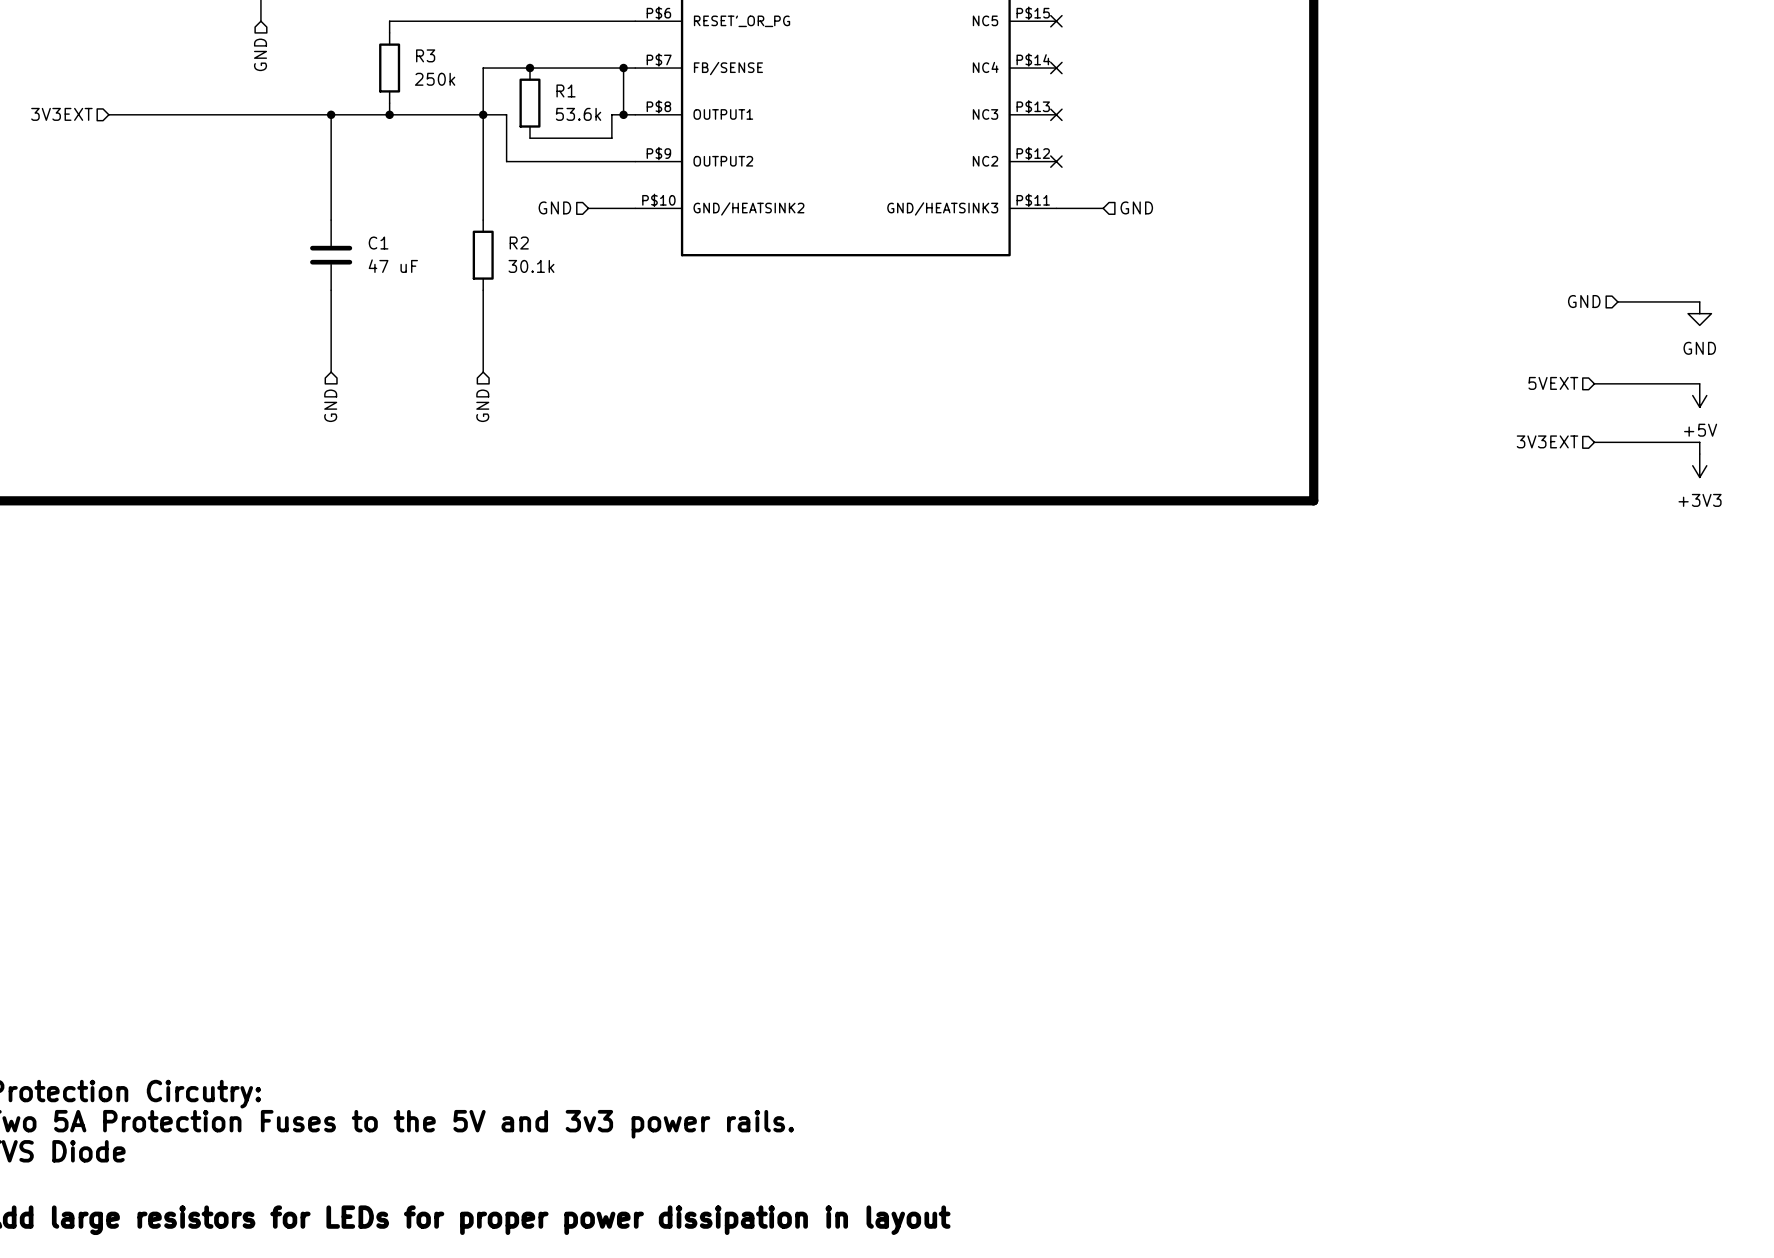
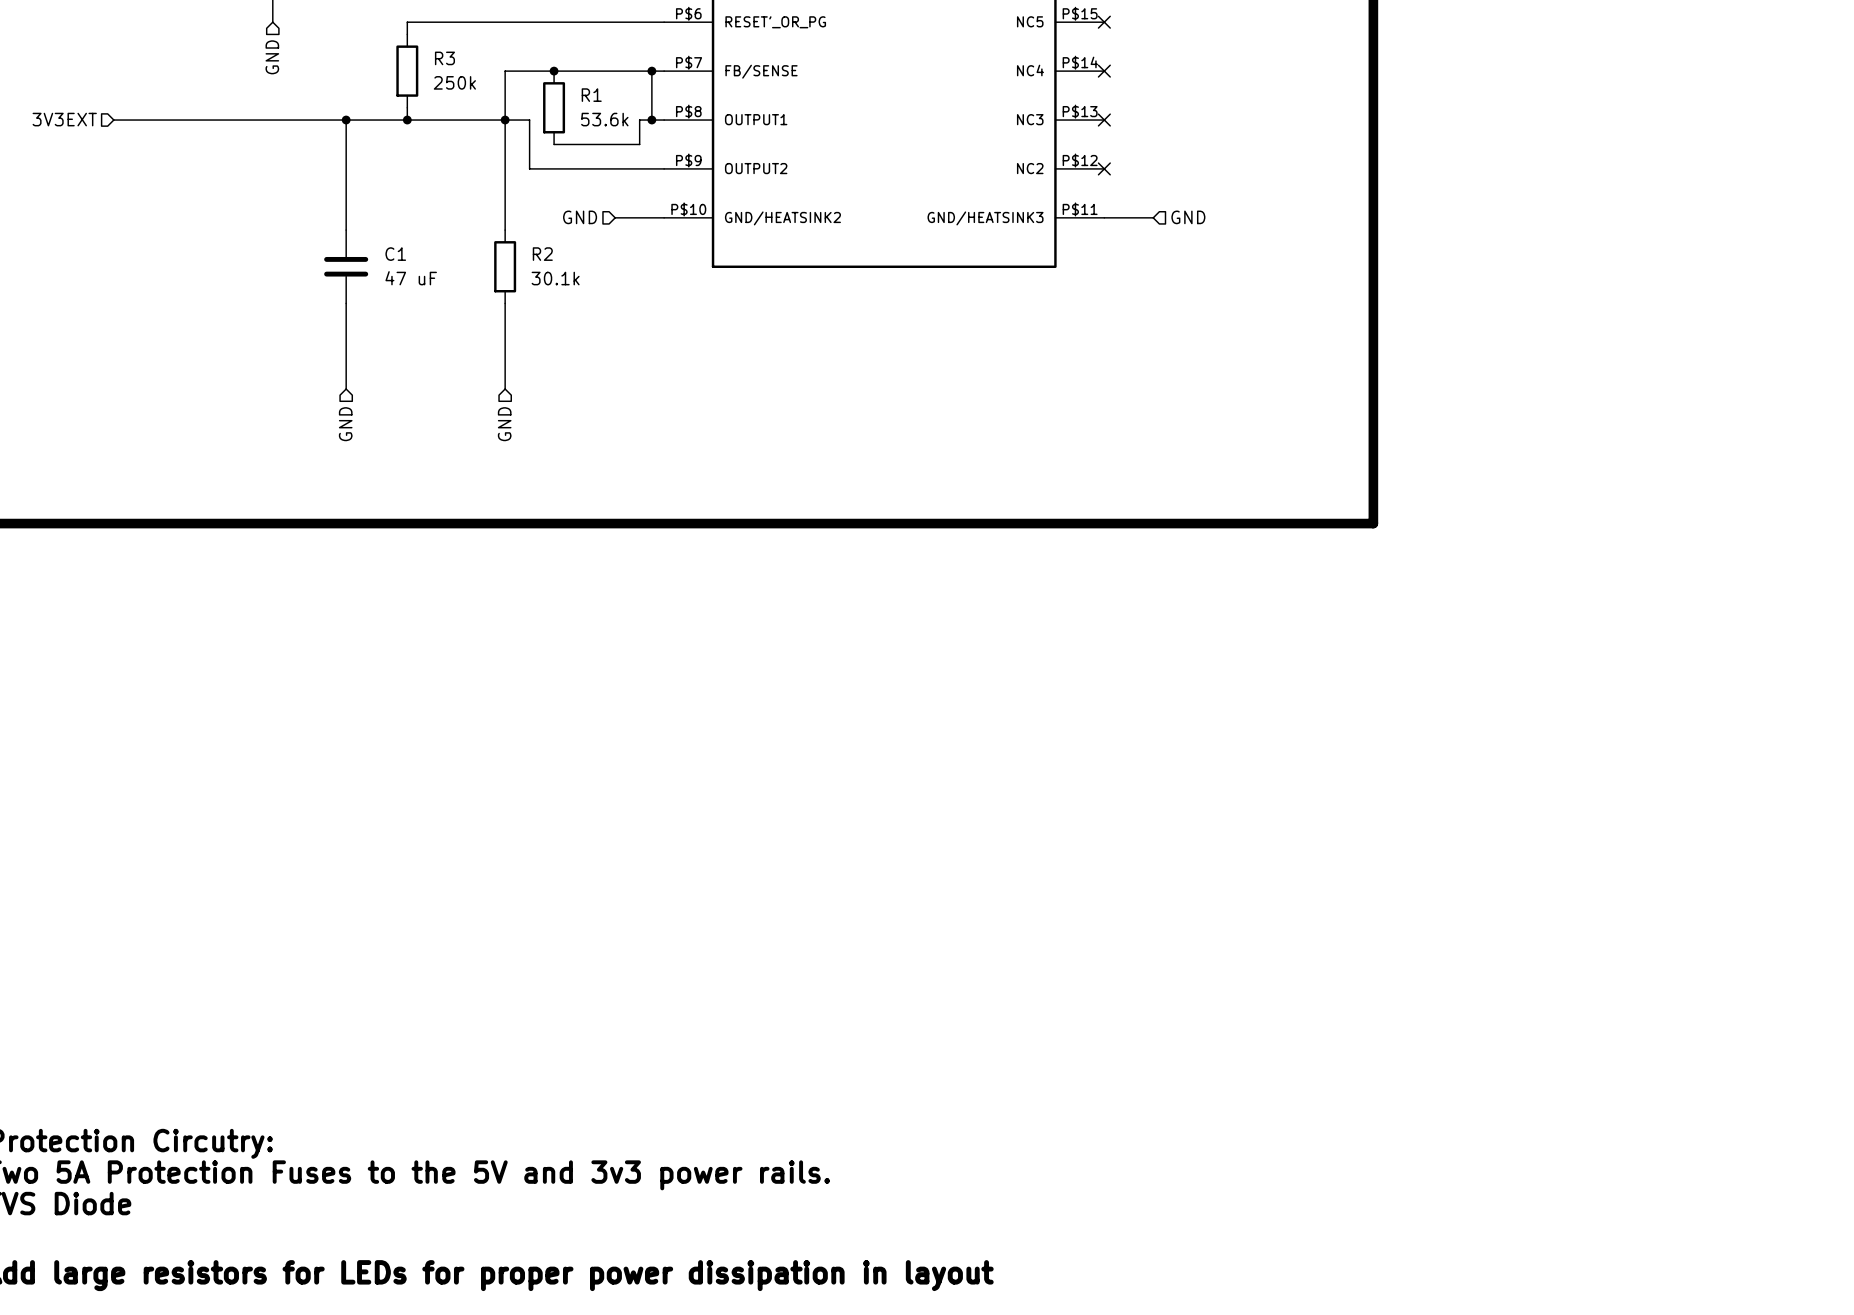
hierarchical label: GND (1584, 301) -> none
wire: (1617, 301) (1699, 301) -> none
power symbol: GND (1699, 313) -> none
hierarchical label: 5VEXT (1553, 383) -> none
wire: (1594, 383) (1699, 383) -> none
power symbol: +5V (1699, 395) -> none
hierarchical label: 3V3EXT (1547, 441) -> none
wire: (1594, 442) (1699, 442) (1699, 454) -> none
power symbol: +3V3 (1699, 465) -> none

